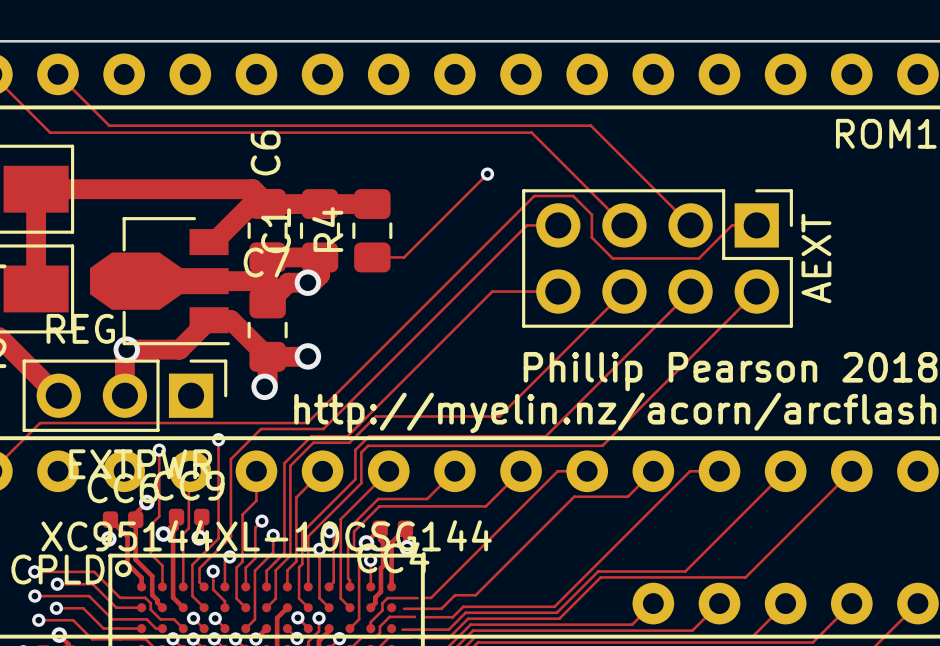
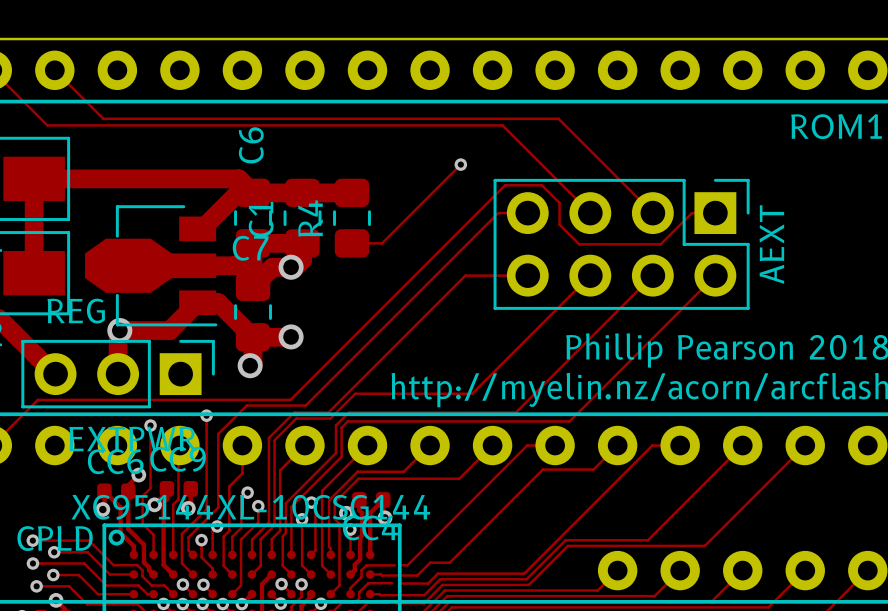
track: none -> (370, 574) (381, 575)
track: none -> (370, 594) (380, 595)

